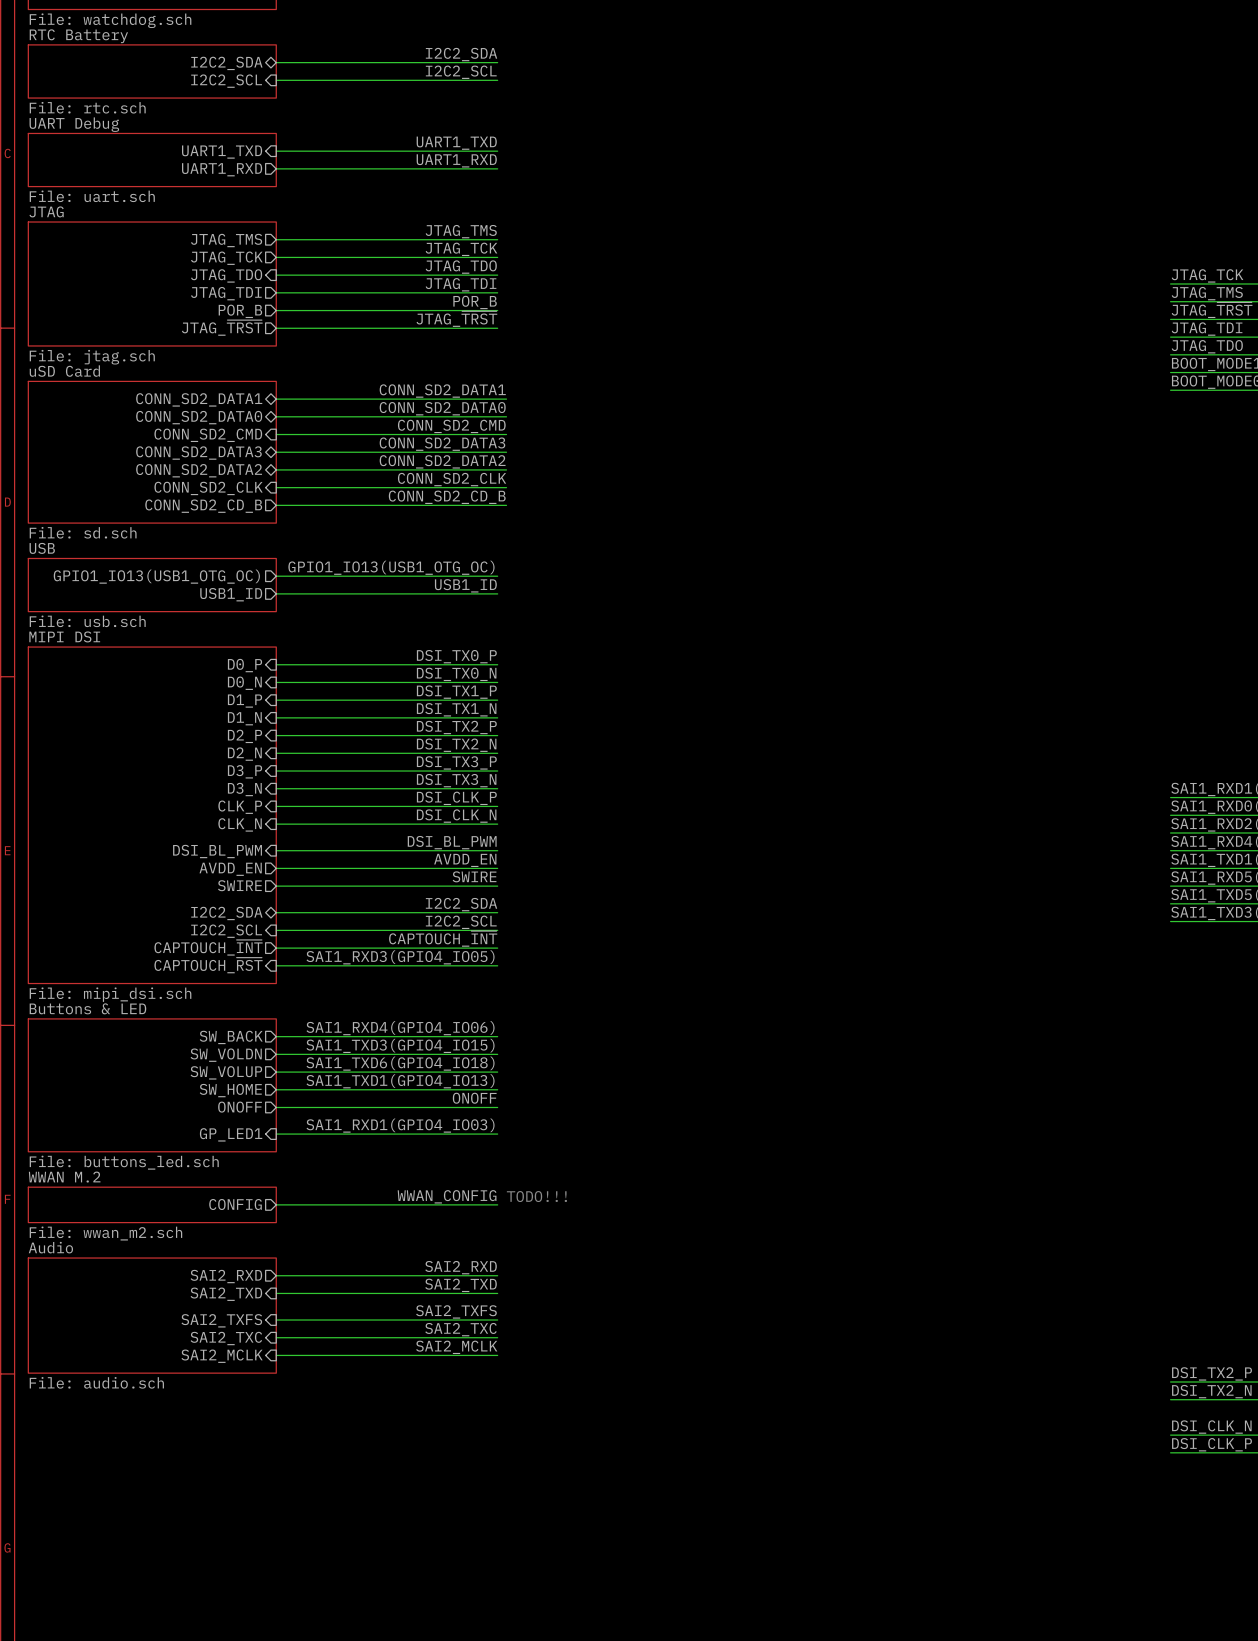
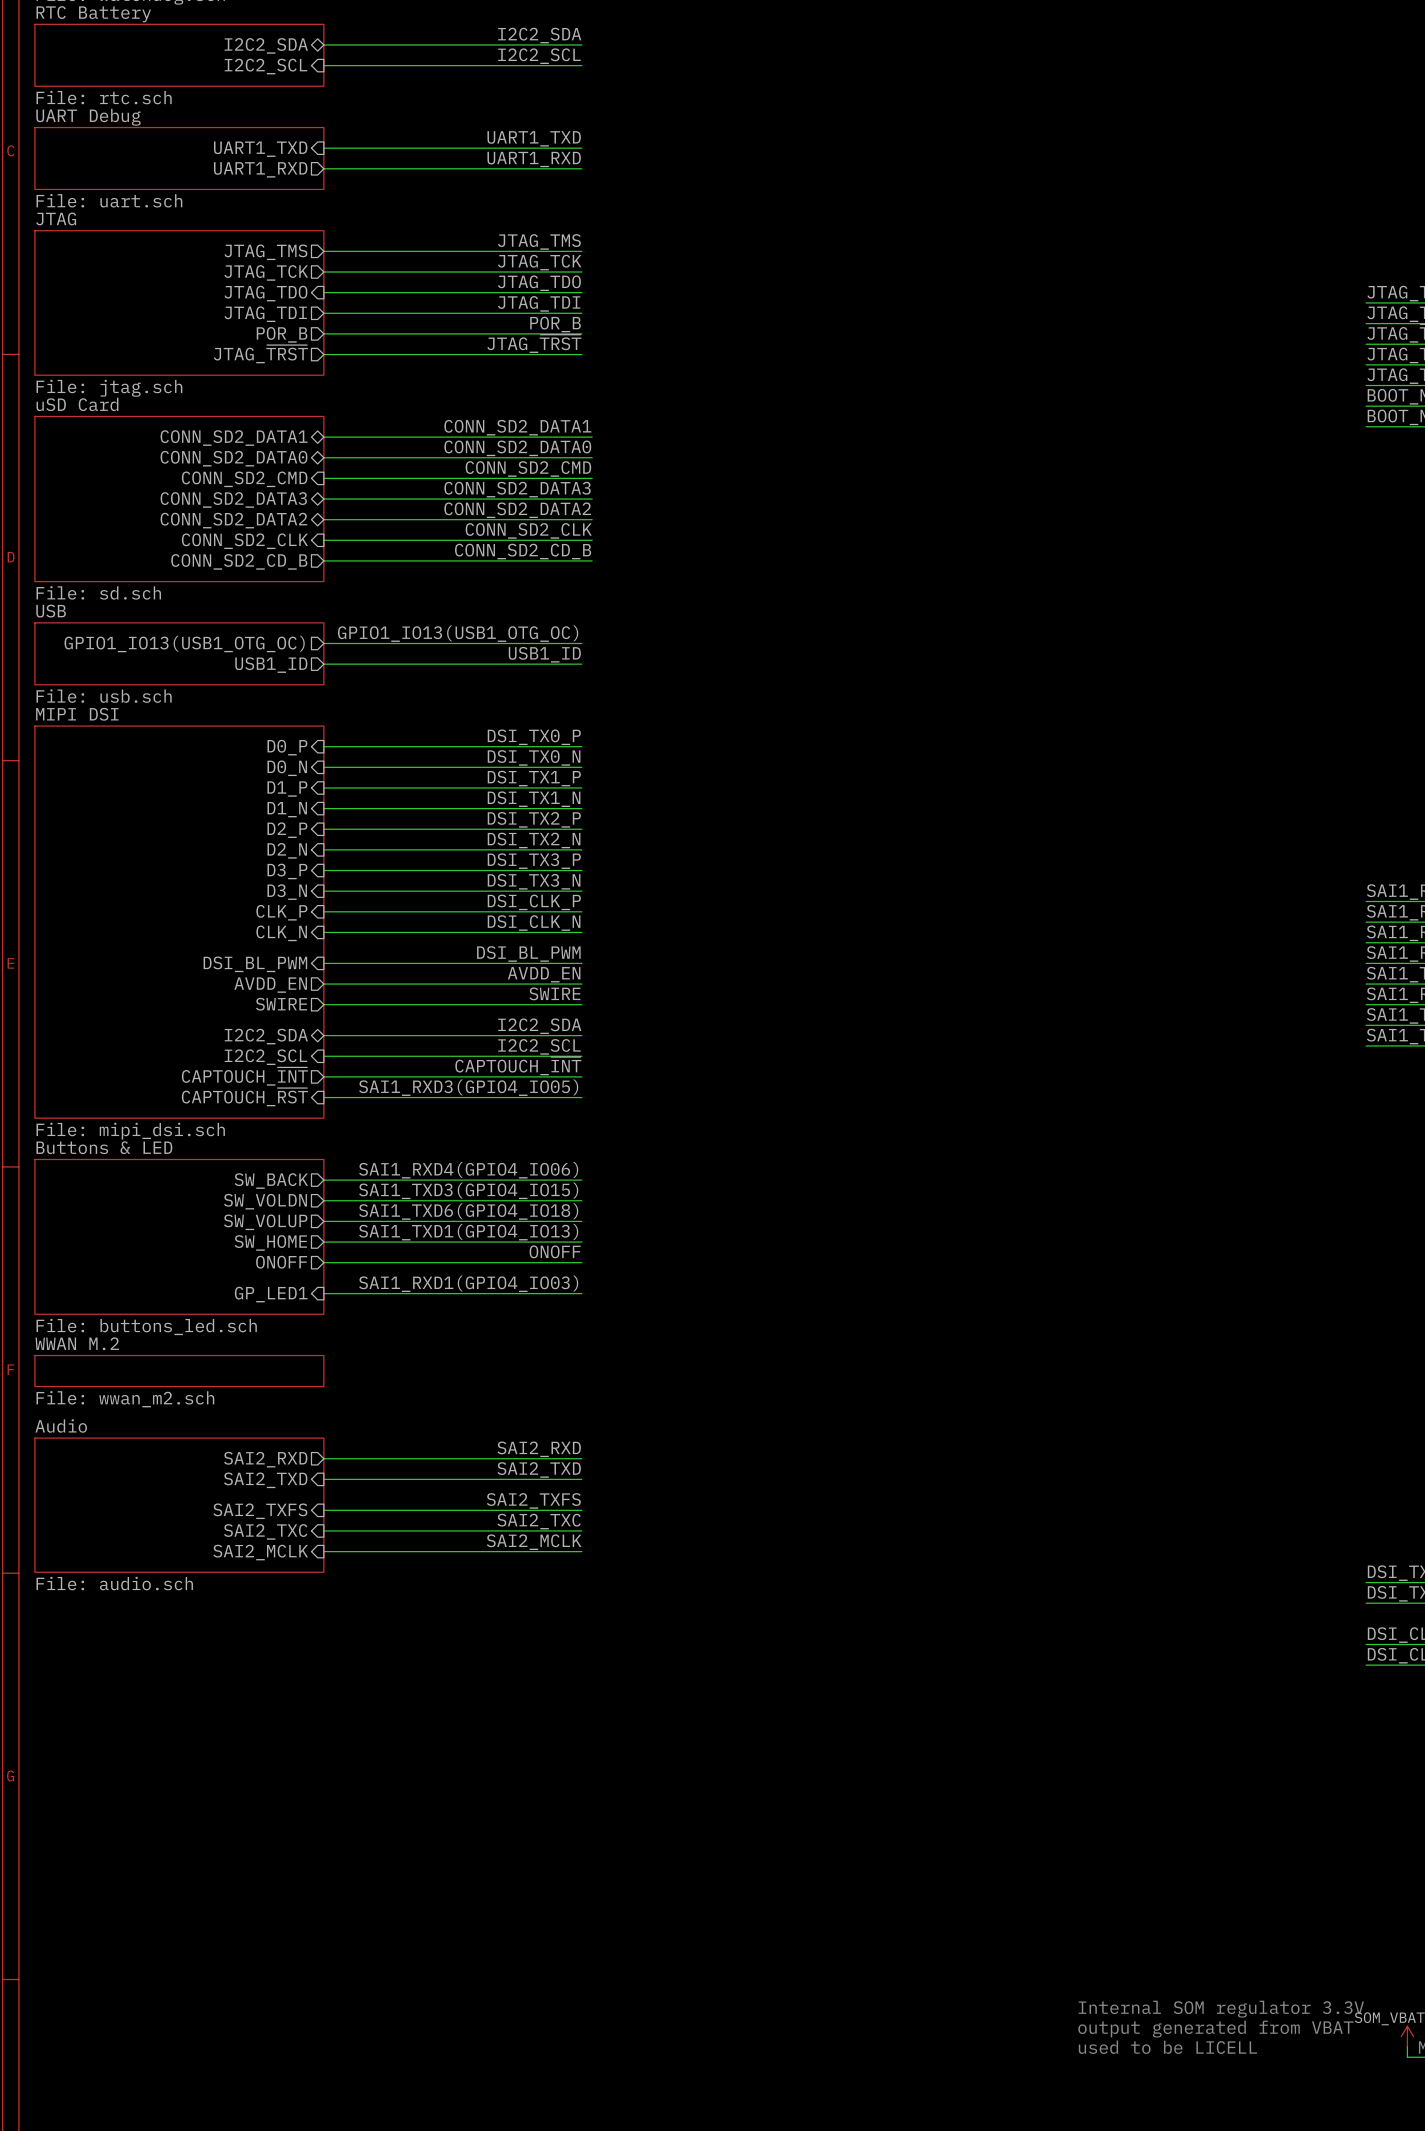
sheet WWAN M.2 shape: [28, 1187, 277, 1223] -> [34, 1355, 324, 1387]
label: WWAN_CONFIG (447, 1196) -> none
text: TODO!!! (536, 1196) -> none
sheet pin: CONFIG (235, 1204) -> none
wire: (276, 1204) (497, 1204) -> none

